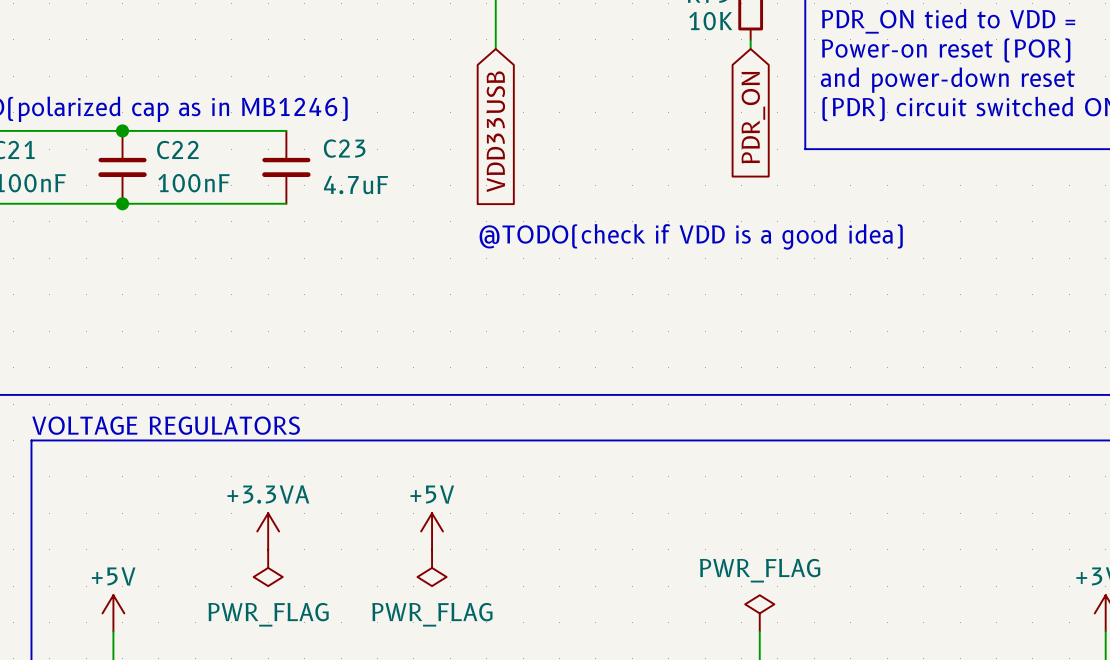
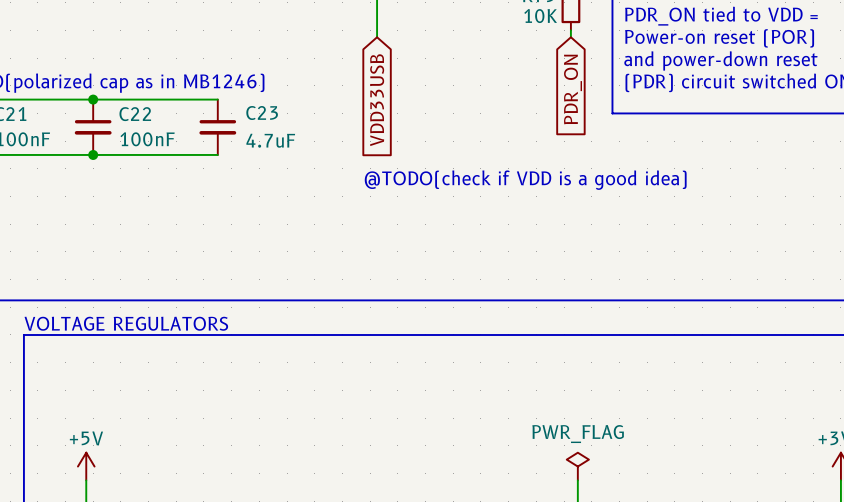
power symbol: +3.3VA (268, 531) -> none
power symbol: +5V (432, 531) -> none
power symbol: PWR_FLAG (268, 567) -> none
power symbol: PWR_FLAG (432, 567) -> none

